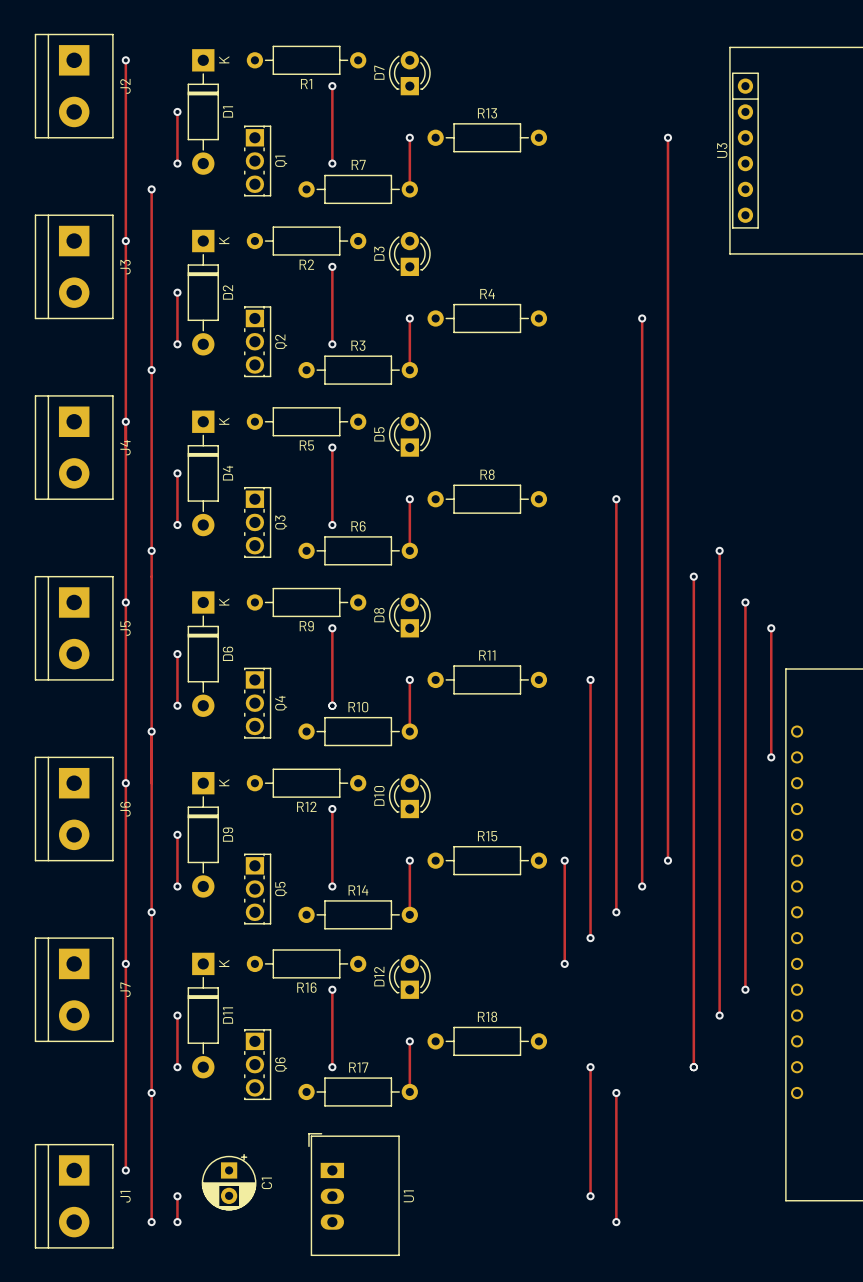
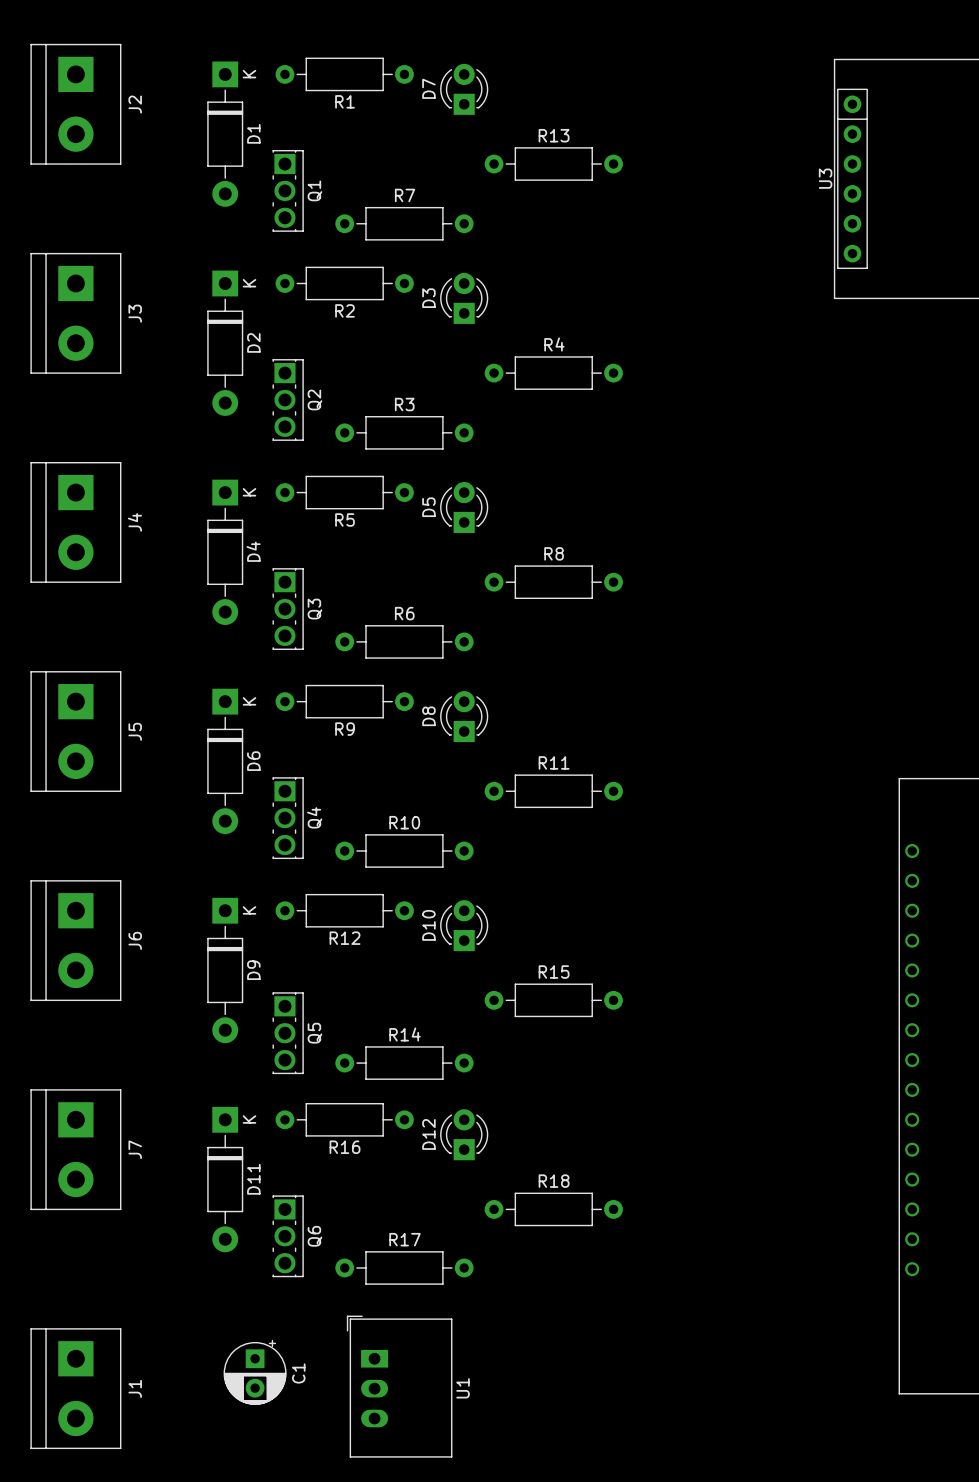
track: (125, 60) (125, 1170) -> none
via: (125, 60) -> none
track: (332, 86) (332, 163) -> none
via: (332, 86) -> none
track: (177, 111) (177, 163) -> none
via: (177, 111) -> none
track: (409, 137) (409, 189) -> none
via: (409, 137) -> none
track: (667, 137) (667, 860) -> none
via: (667, 137) -> none
via: (177, 163) -> none
via: (332, 163) -> none
track: (151, 189) (151, 1222) -> none
via: (151, 189) -> none
via: (125, 241) -> none
track: (332, 266) (332, 344) -> none
via: (332, 266) -> none
track: (177, 292) (177, 344) -> none
via: (177, 292) -> none
track: (409, 318) (409, 370) -> none
via: (409, 318) -> none
track: (642, 318) (642, 886) -> none
via: (642, 318) -> none
via: (177, 344) -> none
via: (332, 344) -> none
via: (151, 370) -> none
via: (125, 421) -> none
track: (332, 447) (332, 525) -> none
via: (332, 447) -> none
track: (177, 473) (177, 525) -> none
via: (177, 473) -> none
track: (409, 499) (409, 550) -> none
via: (409, 499) -> none
track: (616, 499) (616, 912) -> none
via: (616, 499) -> none
via: (177, 525) -> none
via: (332, 525) -> none
via: (151, 550) -> none
track: (719, 550) (719, 1015) -> none
via: (719, 550) -> none
track: (693, 576) (693, 1067) -> none
via: (693, 576) -> none
via: (125, 602) -> none
track: (745, 602) (745, 989) -> none
via: (745, 602) -> none
track: (332, 628) (332, 705) -> none
via: (332, 628) -> none
track: (771, 628) (771, 757) -> none
via: (771, 628) -> none
track: (177, 654) (177, 705) -> none
via: (177, 654) -> none
track: (409, 679) (409, 731) -> none
via: (409, 679) -> none
track: (590, 679) (590, 938) -> none
via: (590, 679) -> none
via: (177, 705) -> none
via: (332, 705) -> none
via: (151, 731) -> none
via: (771, 757) -> none
via: (125, 783) -> none
track: (332, 809) (332, 886) -> none
via: (332, 809) -> none
track: (177, 834) (177, 886) -> none
via: (177, 834) -> none
track: (409, 860) (409, 914) -> none
via: (409, 860) -> none
track: (564, 860) (564, 963) -> none
via: (564, 860) -> none
via: (667, 860) -> none
via: (177, 886) -> none
via: (332, 886) -> none
via: (642, 886) -> none
via: (151, 912) -> none
via: (616, 912) -> none
via: (590, 938) -> none
via: (125, 963) -> none
via: (564, 963) -> none
track: (332, 989) (332, 1067) -> none
via: (332, 989) -> none
via: (745, 989) -> none
track: (177, 1015) (177, 1067) -> none
via: (177, 1015) -> none
via: (719, 1015) -> none
track: (409, 1041) (409, 1091) -> none
via: (409, 1041) -> none
via: (177, 1067) -> none
via: (332, 1067) -> none
track: (590, 1067) (590, 1196) -> none
via: (590, 1067) -> none
via: (693, 1067) -> none
via: (151, 1093) -> none
track: (616, 1093) (616, 1222) -> none
via: (616, 1093) -> none
via: (125, 1170) -> none
track: (177, 1196) (177, 1222) -> none
via: (177, 1196) -> none
via: (590, 1196) -> none
via: (151, 1222) -> none
via: (177, 1222) -> none
via: (616, 1222) -> none

